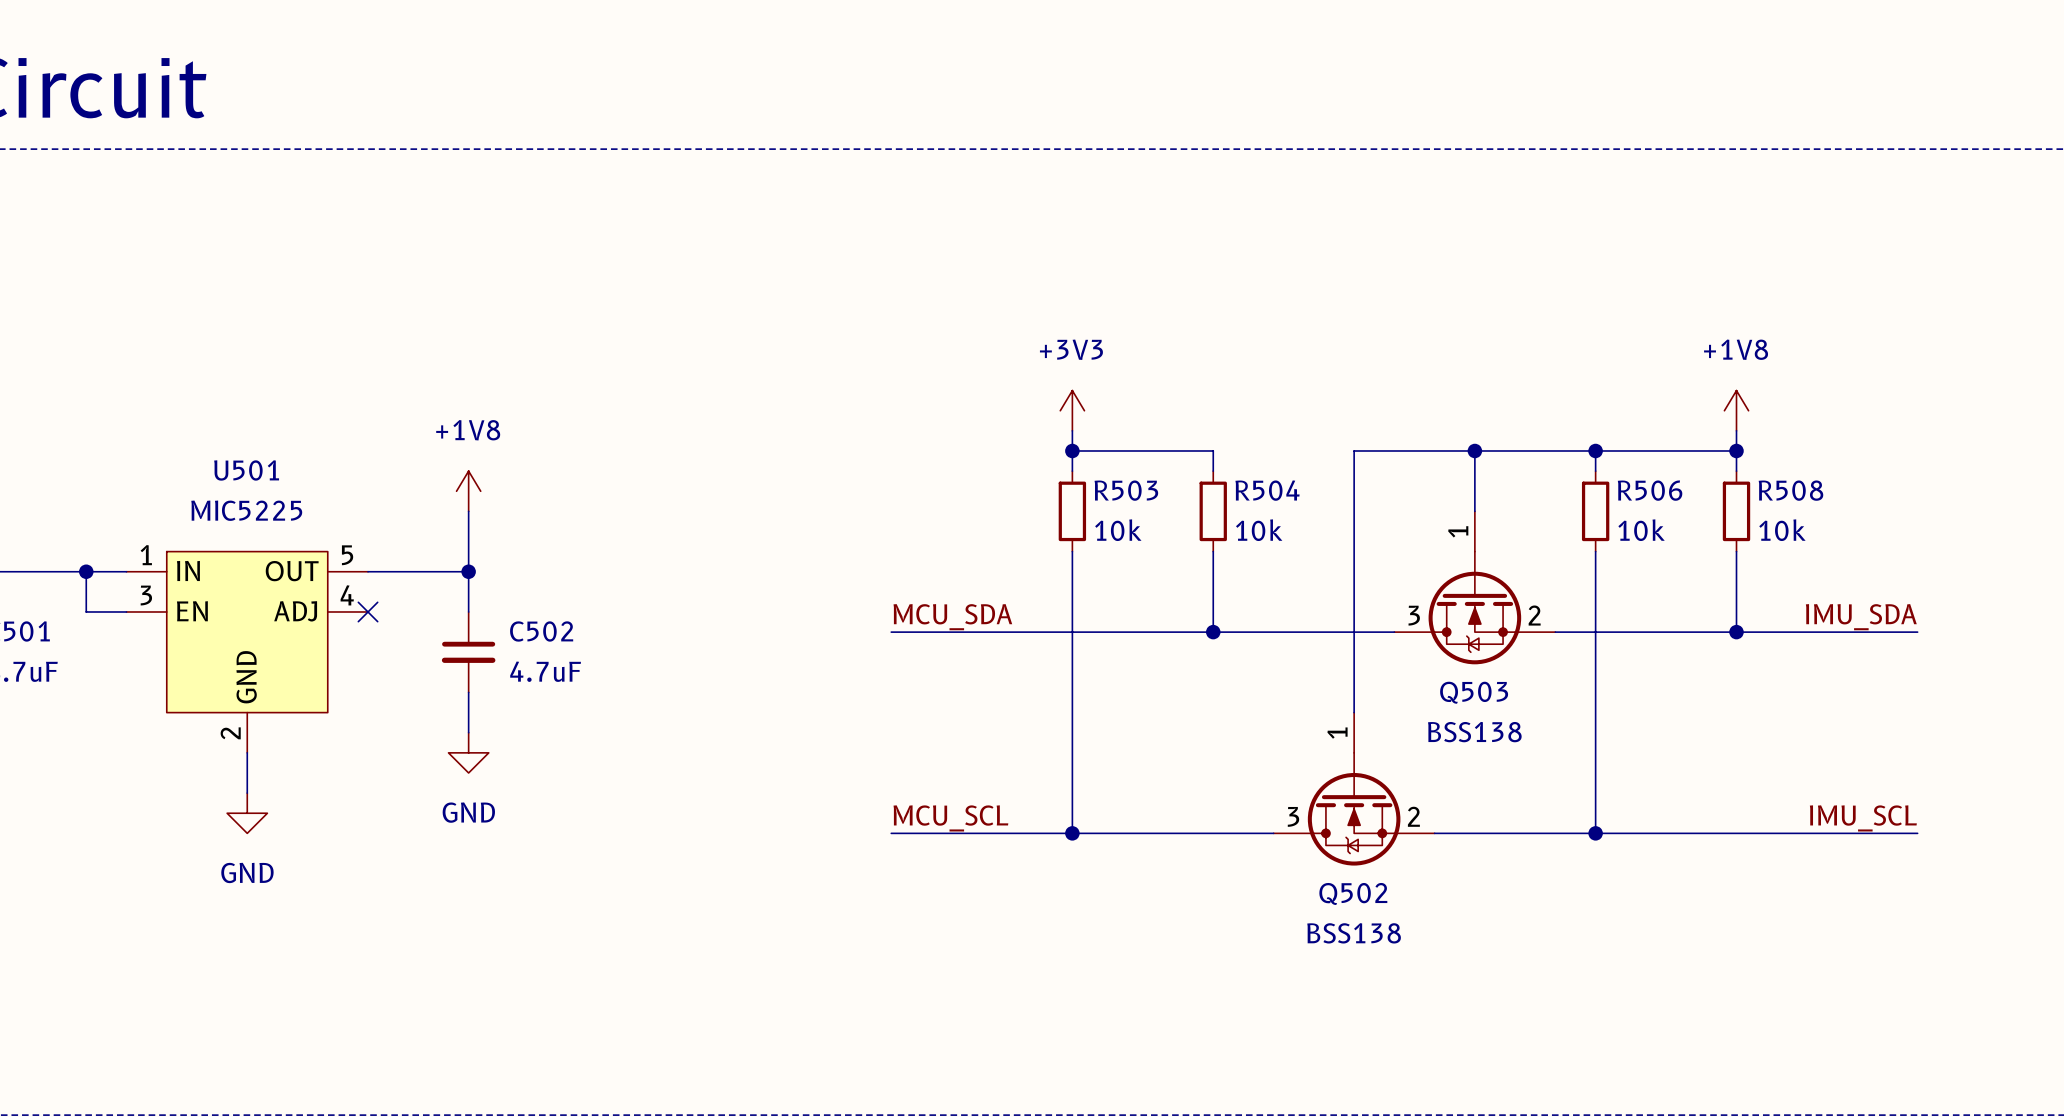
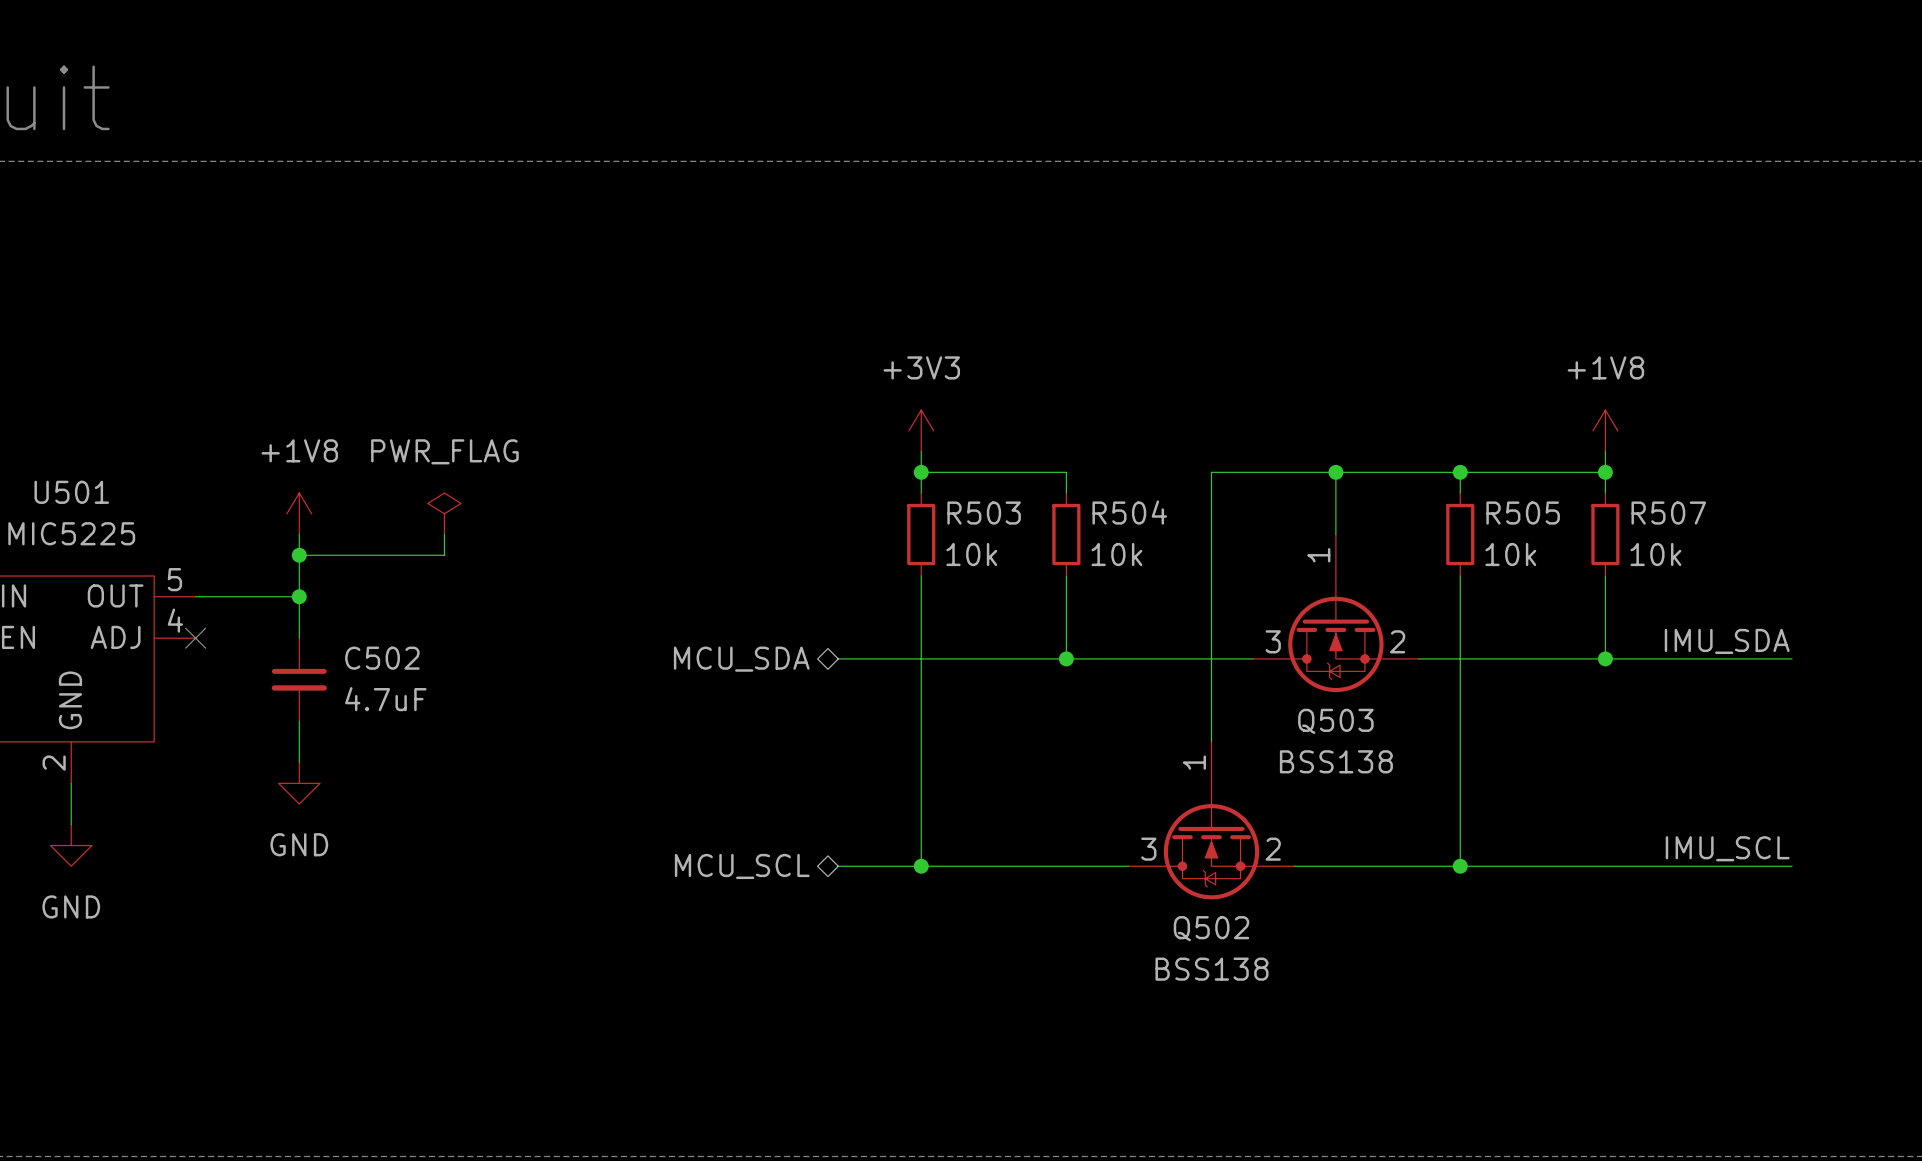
R506 name: R506 (1650, 490) -> R505 (1523, 513)
R508 name: R508 (1790, 490) -> R507 (1668, 513)
power symbol: none -> PWR_FLAG (444, 513)
wire: none -> (444, 534) (444, 555) (299, 555)
junction: none -> (299, 555)
label: MCU_SDA (952, 617) -> none
wire: (891, 632) (991, 632) -> none
hierarchical label: none -> MCU_SDA (741, 659)
label: MCU_SCL (950, 818) -> none
wire: (891, 833) (991, 833) -> none
hierarchical label: none -> MCU_SCL (742, 866)

